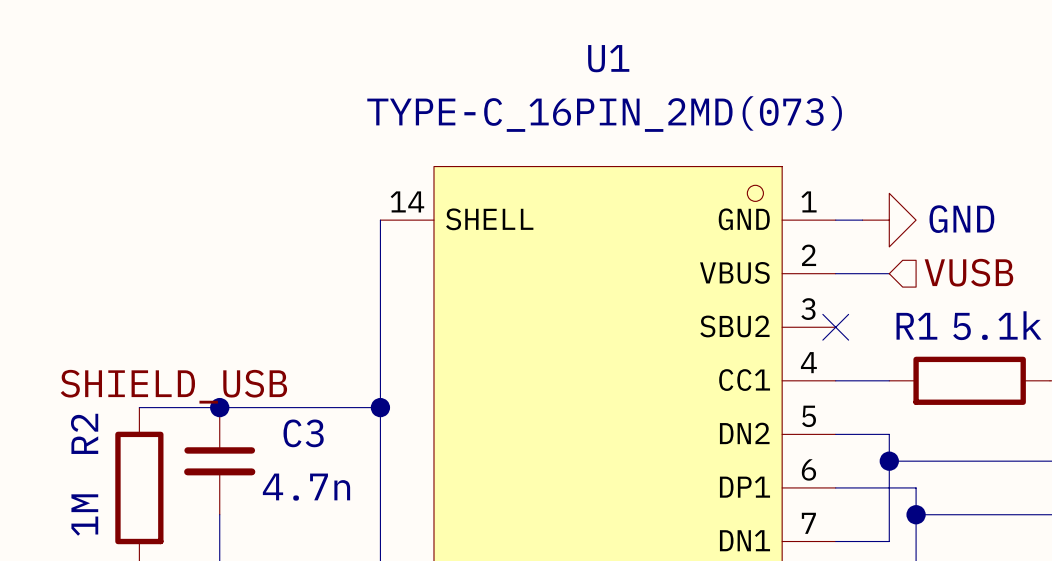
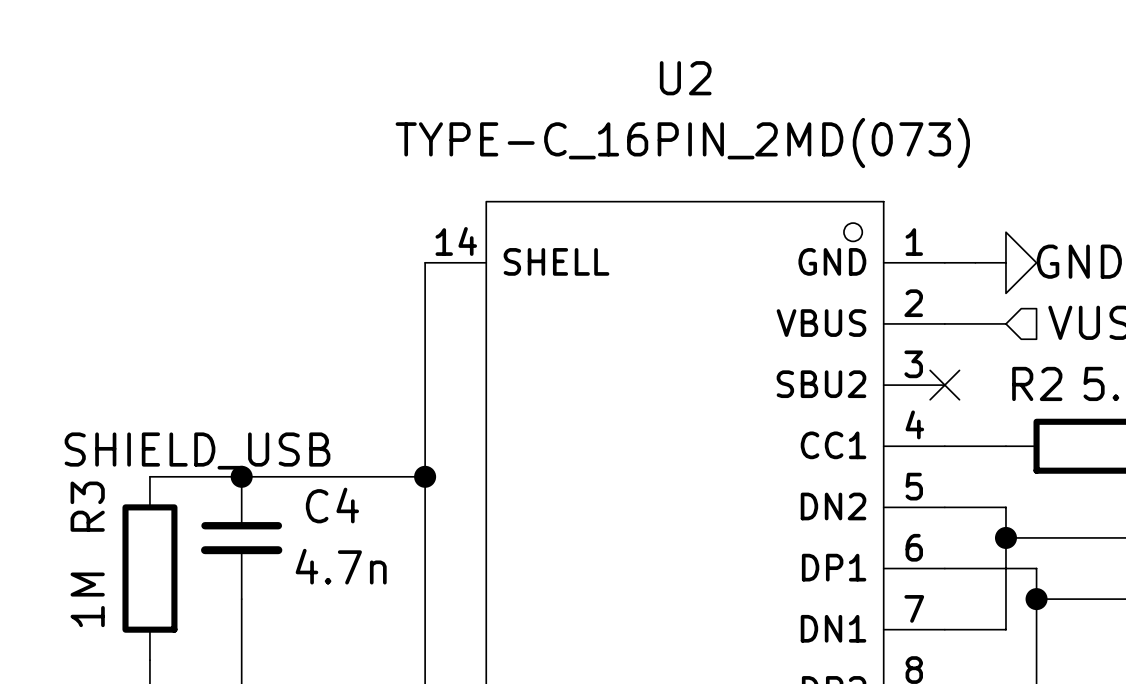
U1 name: U1 (608, 58) -> U2 (685, 78)
R1 name: R1 (916, 326) -> R2 (1037, 383)
R2 name: R2 (84, 433) -> R3 (87, 506)
C3 name: C3 (303, 433) -> C4 (332, 505)

